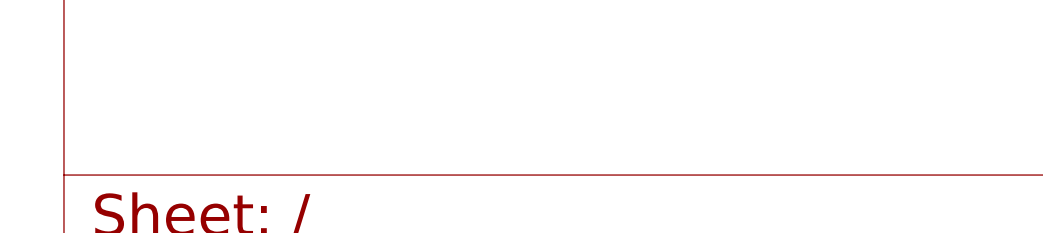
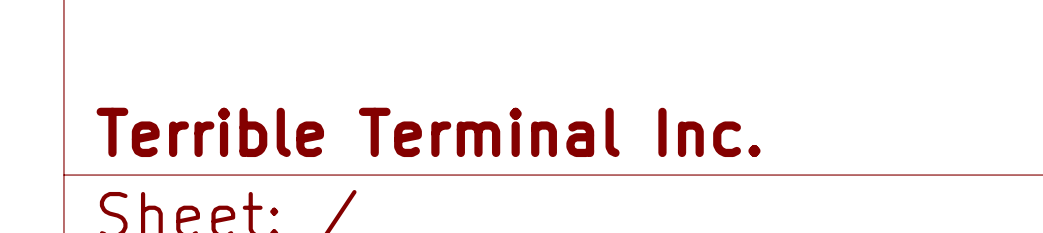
title block: none -> Terrible Terminal Inc. (428, 132)

